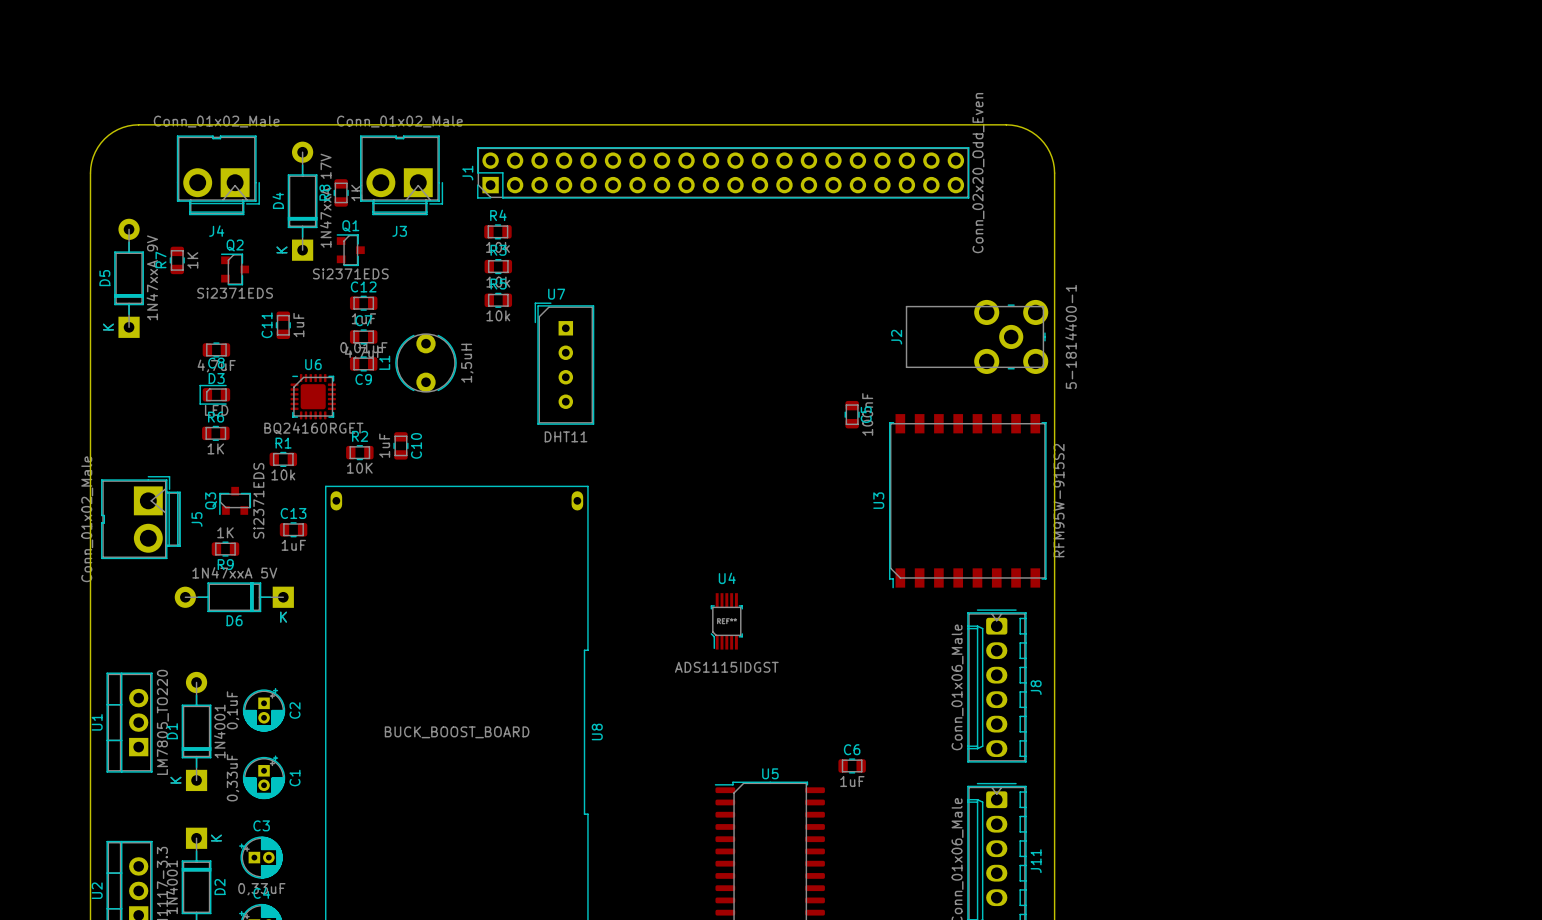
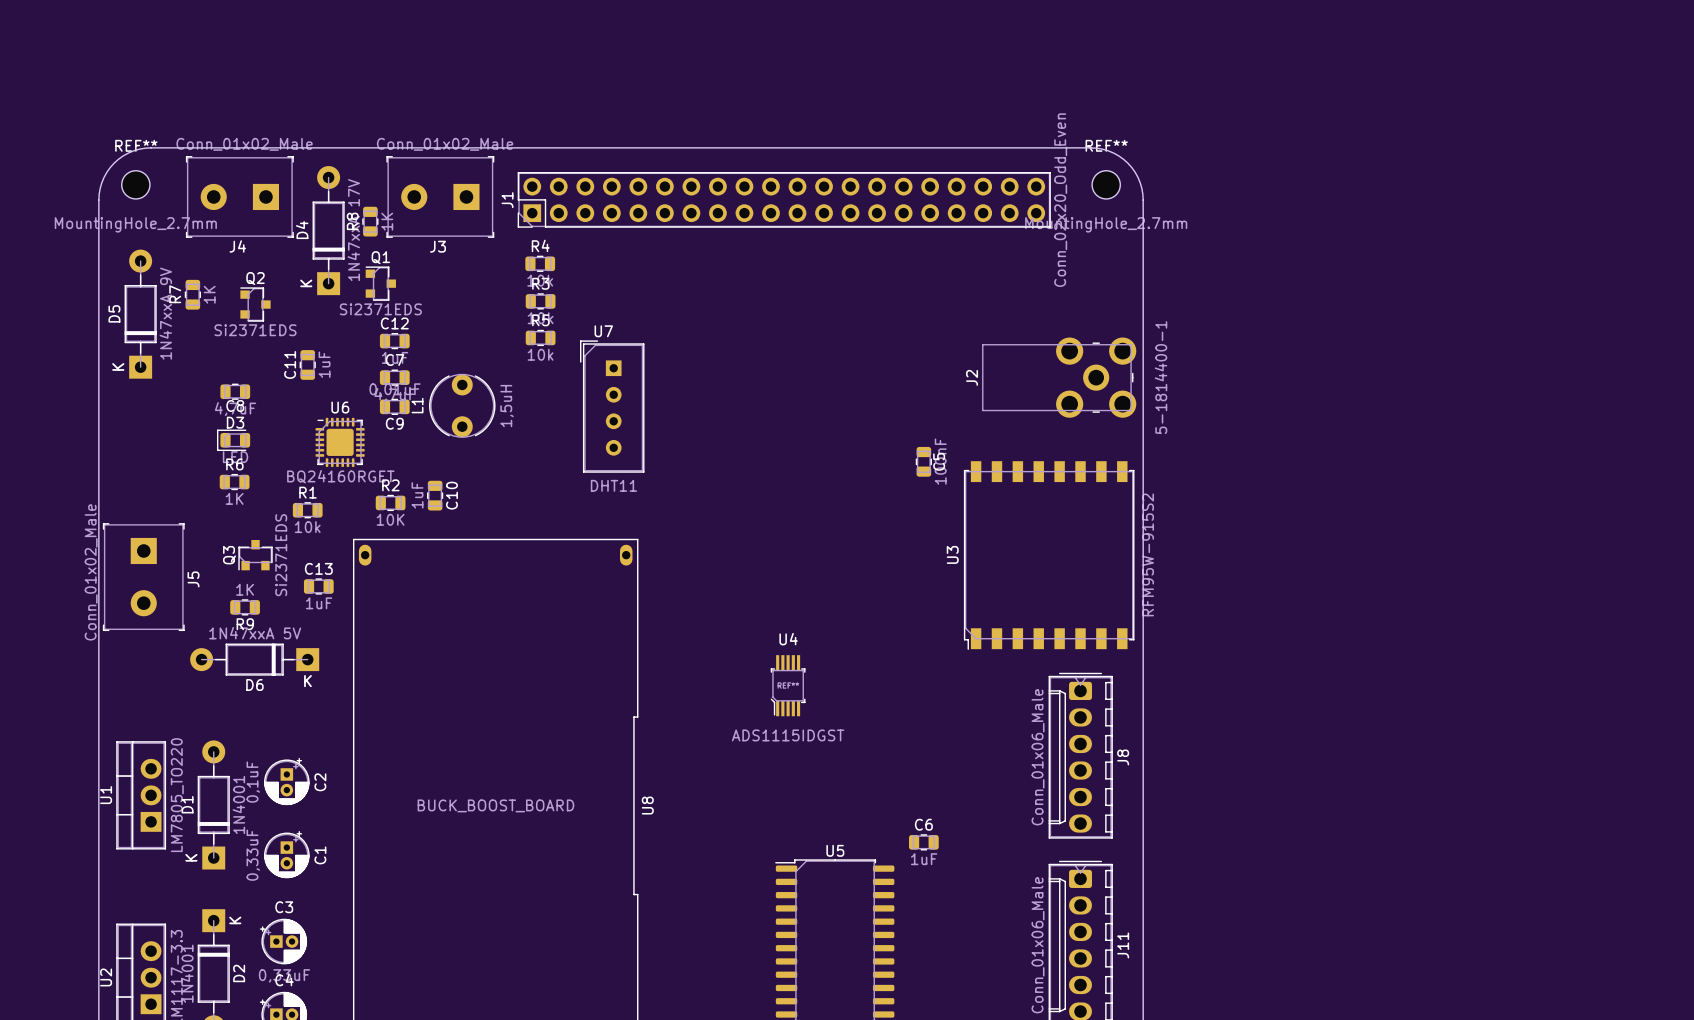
J4 footprint: [176, 135, 260, 216] -> [186, 156, 294, 238]
J3 footprint: [360, 135, 443, 216] -> [386, 156, 495, 238]
REF**: none -> MountingHole_2.7mm (135, 184)
REF**: none -> MountingHole_2.7mm (1106, 184)
J5 footprint: [101, 476, 181, 559] -> [103, 523, 185, 631]

